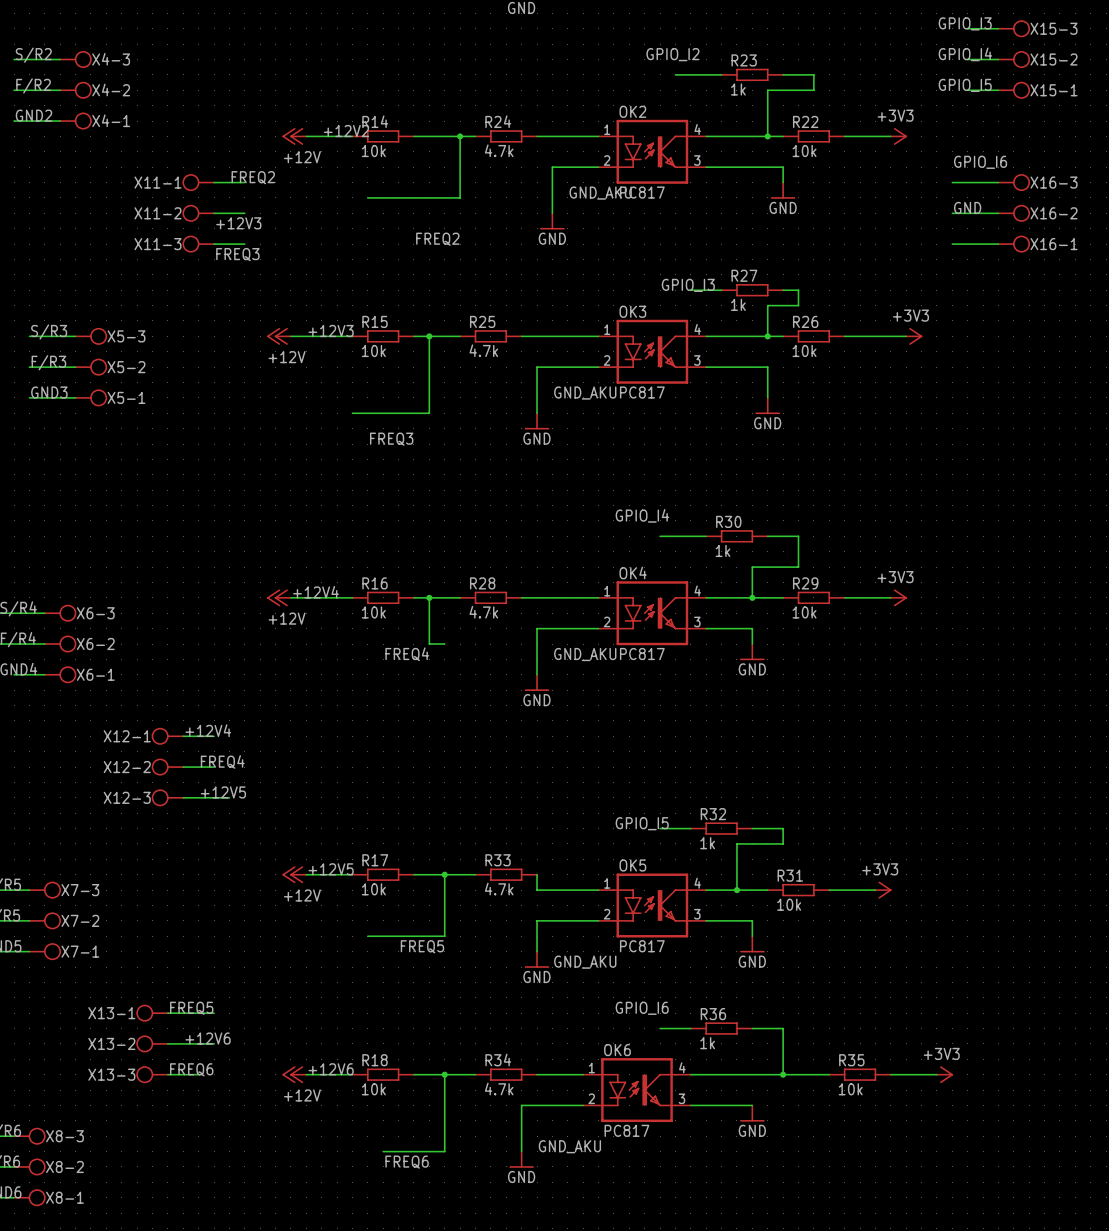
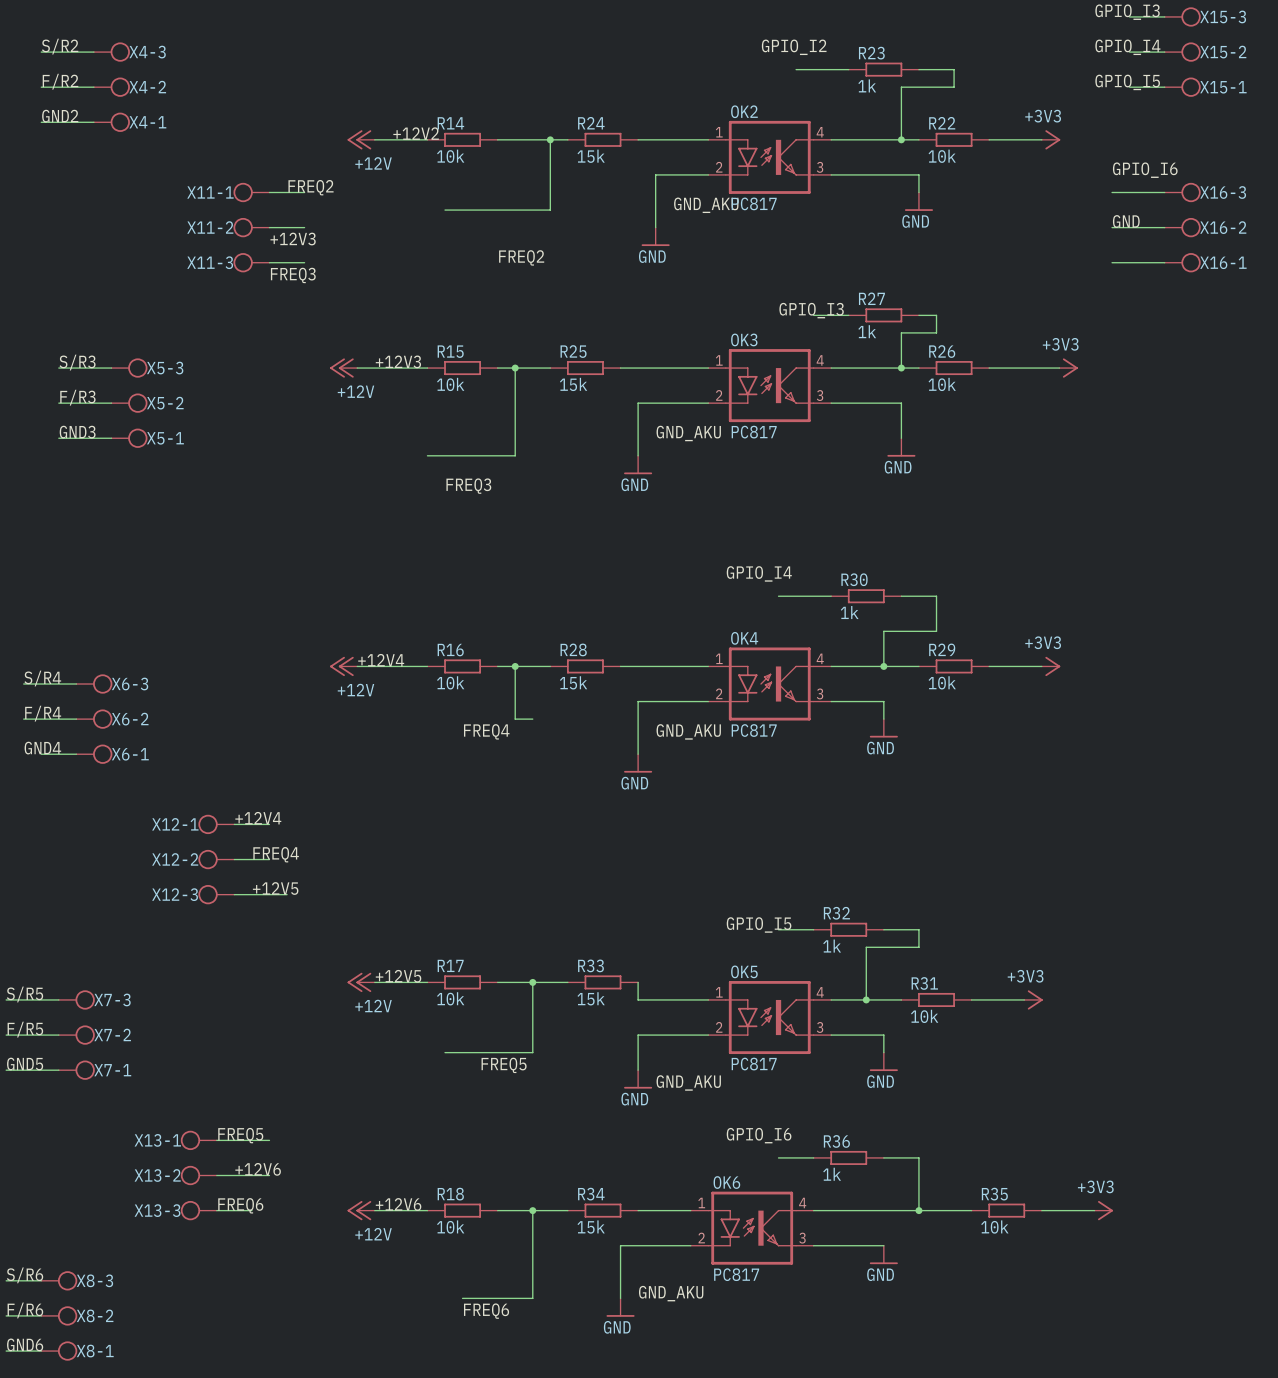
R24 value: 4.7k (499, 150) -> 15k (591, 156)
R25 value: 4.7k (483, 350) -> 15k (573, 384)
R28 value: 4.7k (483, 612) -> 15k (573, 682)
R33 value: 4.7k (499, 889) -> 15k (591, 998)
R34 value: 4.7k (499, 1089) -> 15k (591, 1227)

